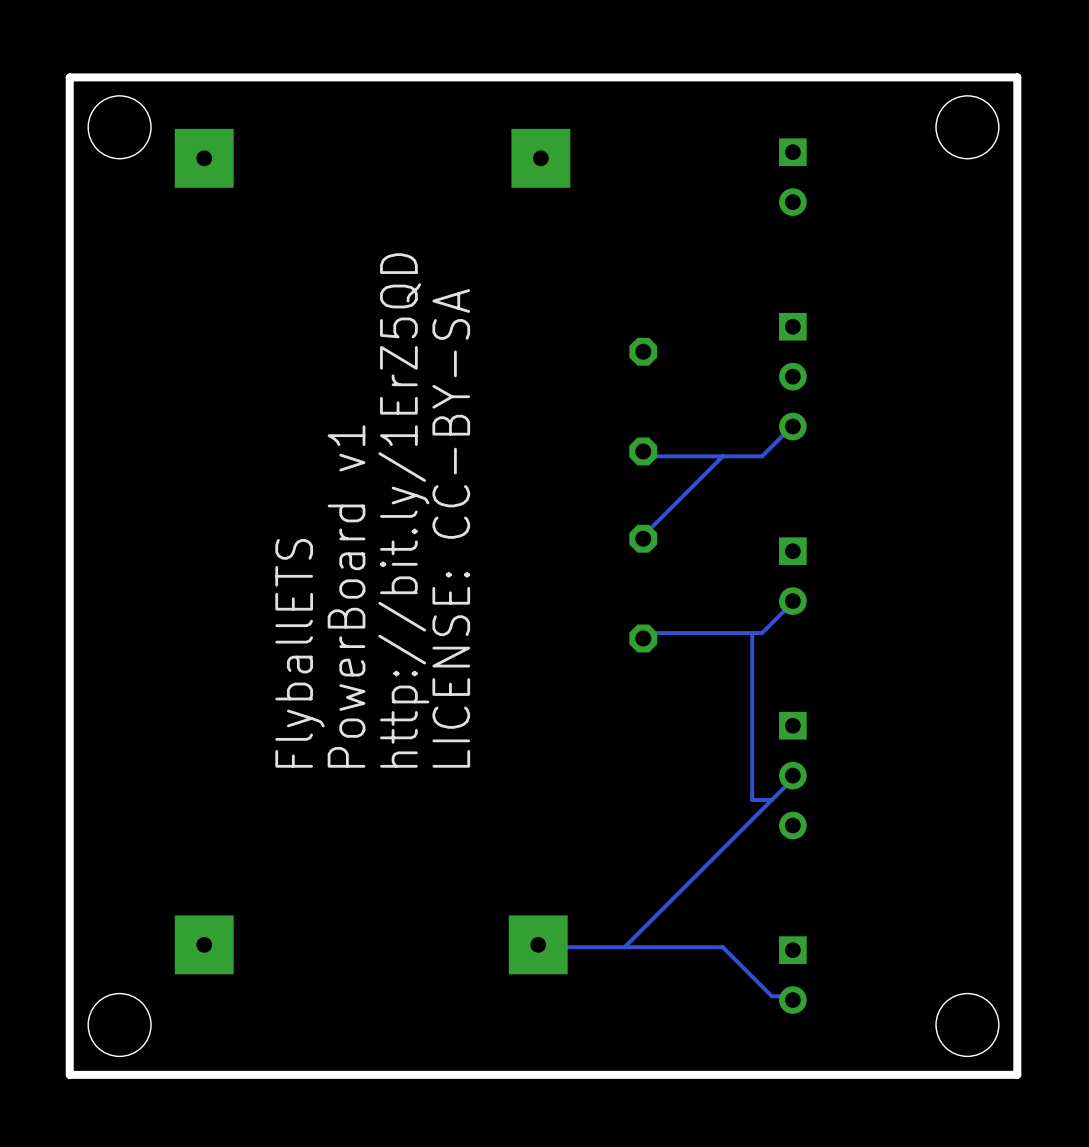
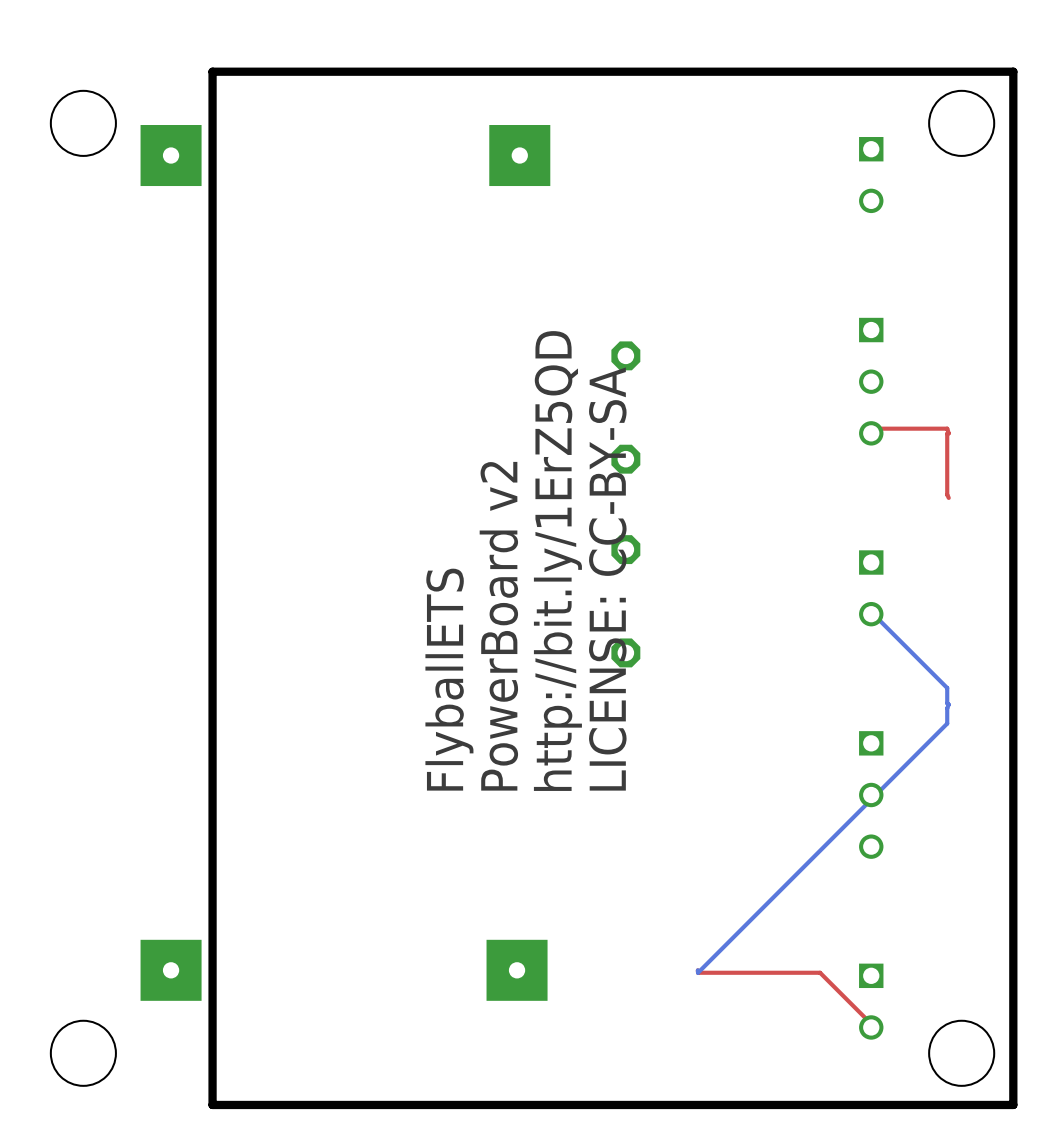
board edge: (244, 77) (69, 77) (69, 1074) (244, 1074) -> (212, 71) (212, 1104)
part: (792, 177) -> none
part: none -> (871, 175)
part: (792, 376) -> none
part: none -> (871, 381)
bottom track: (792, 426) (762, 456) (644, 456) (643, 451) -> none
top track: none -> (871, 433) (876, 428) (947, 428) (948, 497)
bottom track: (722, 456) (644, 534) (643, 538) -> none
text position: http://bit.ly/1ErZ5QD (403, 510) -> http://bit.ly/1ErZ5QD (557, 561)
text position: LICENSE: CC-BY-SA (451, 528) -> LICENSE: CC-BY-SA (607, 579)
part: (792, 576) -> none
part: none -> (871, 588)
text: PowerBoard v1 (346, 596) -> none
text: none -> PowerBoard v2 (498, 626)
bottom track: (792, 601) (762, 633) (644, 633) (643, 638) -> none
bottom track: none -> (871, 614) (947, 688) (948, 704) (947, 723) (876, 794) (871, 794) (870, 799) (698, 972) (697, 970)
bottom track: (752, 633) (752, 799) (771, 799) -> none
text position: FlyballETS (299, 653) -> FlyballETS (449, 679)
bottom track: (792, 775) (791, 780) (624, 947) -> none
part: (792, 775) -> none
part: none -> (871, 794)
bottom track: (538, 944) (546, 947) (722, 947) (771, 996) (791, 996) (792, 1000) -> none
top track: none -> (697, 970) (698, 972) (820, 972) (870, 1023) (871, 1027)
part: (792, 975) -> none
part: none -> (871, 1001)

